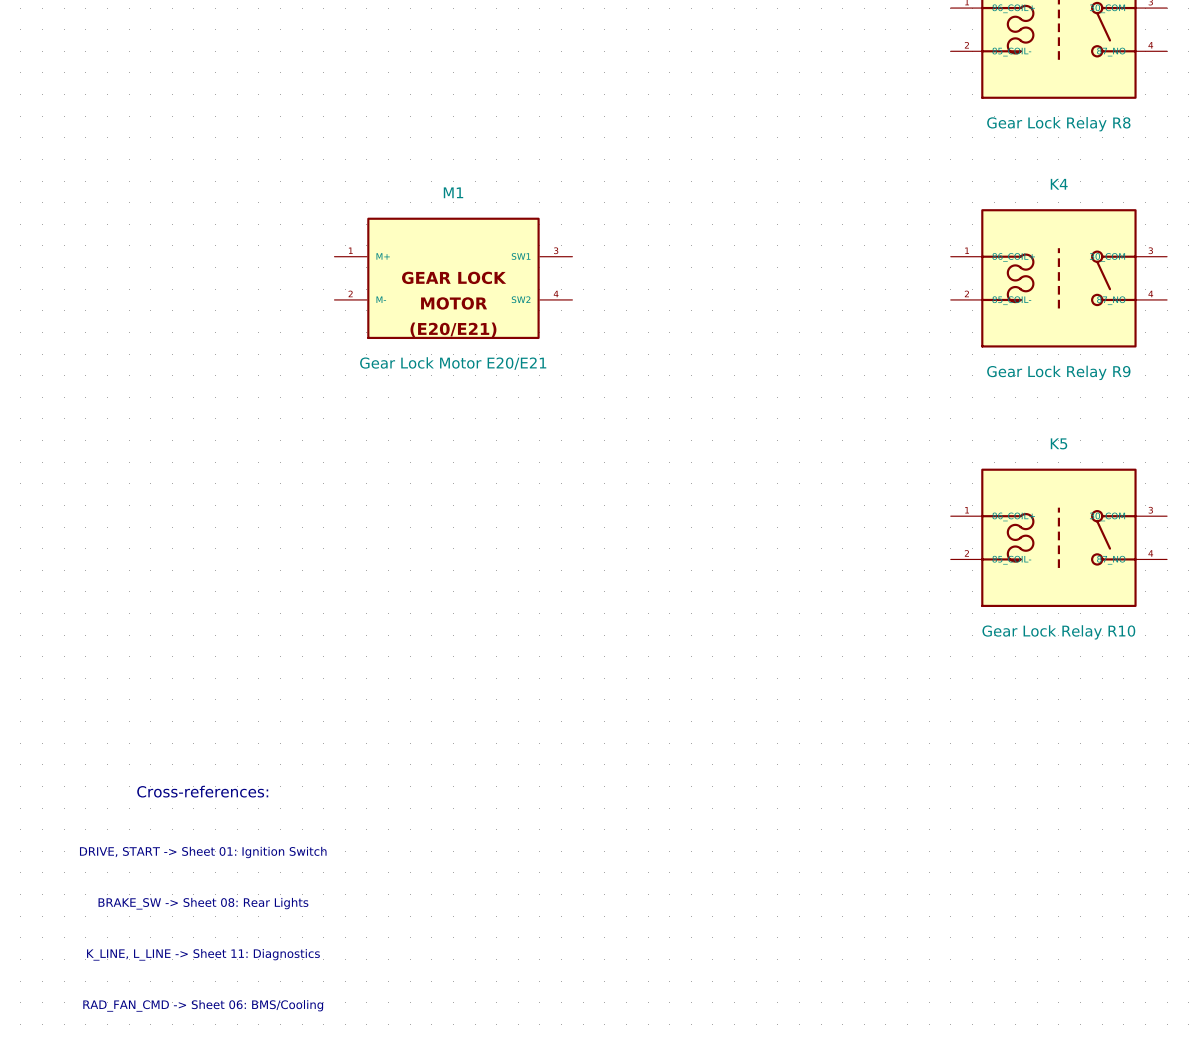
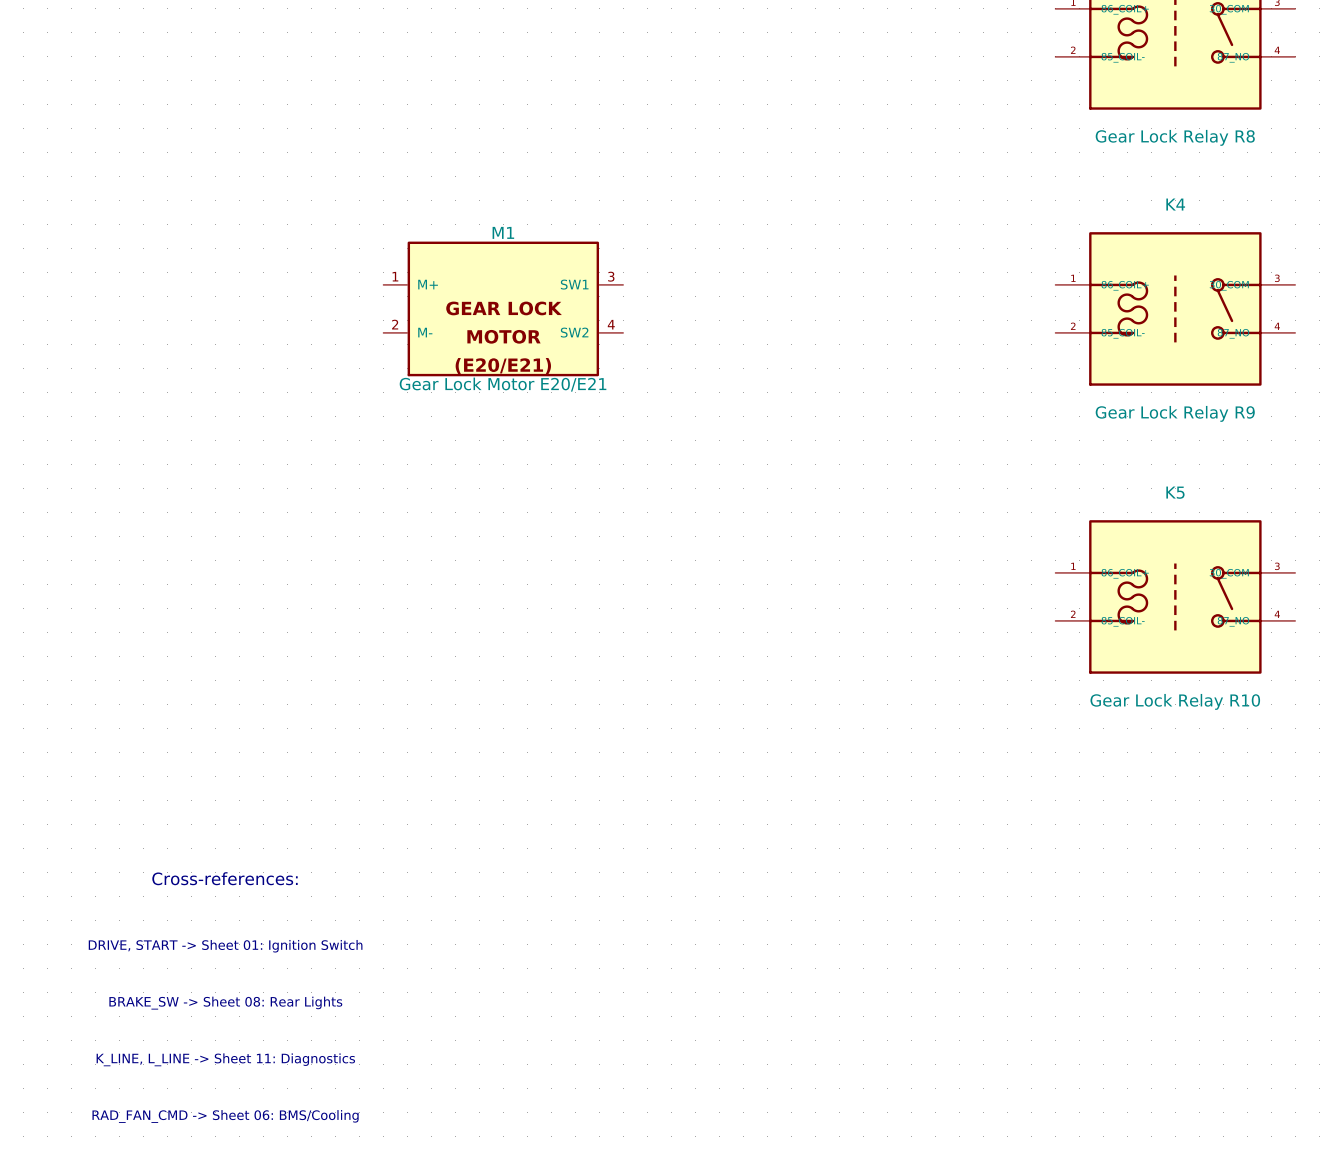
M1 symbol: [334, 217, 573, 340] -> [383, 241, 624, 377]

